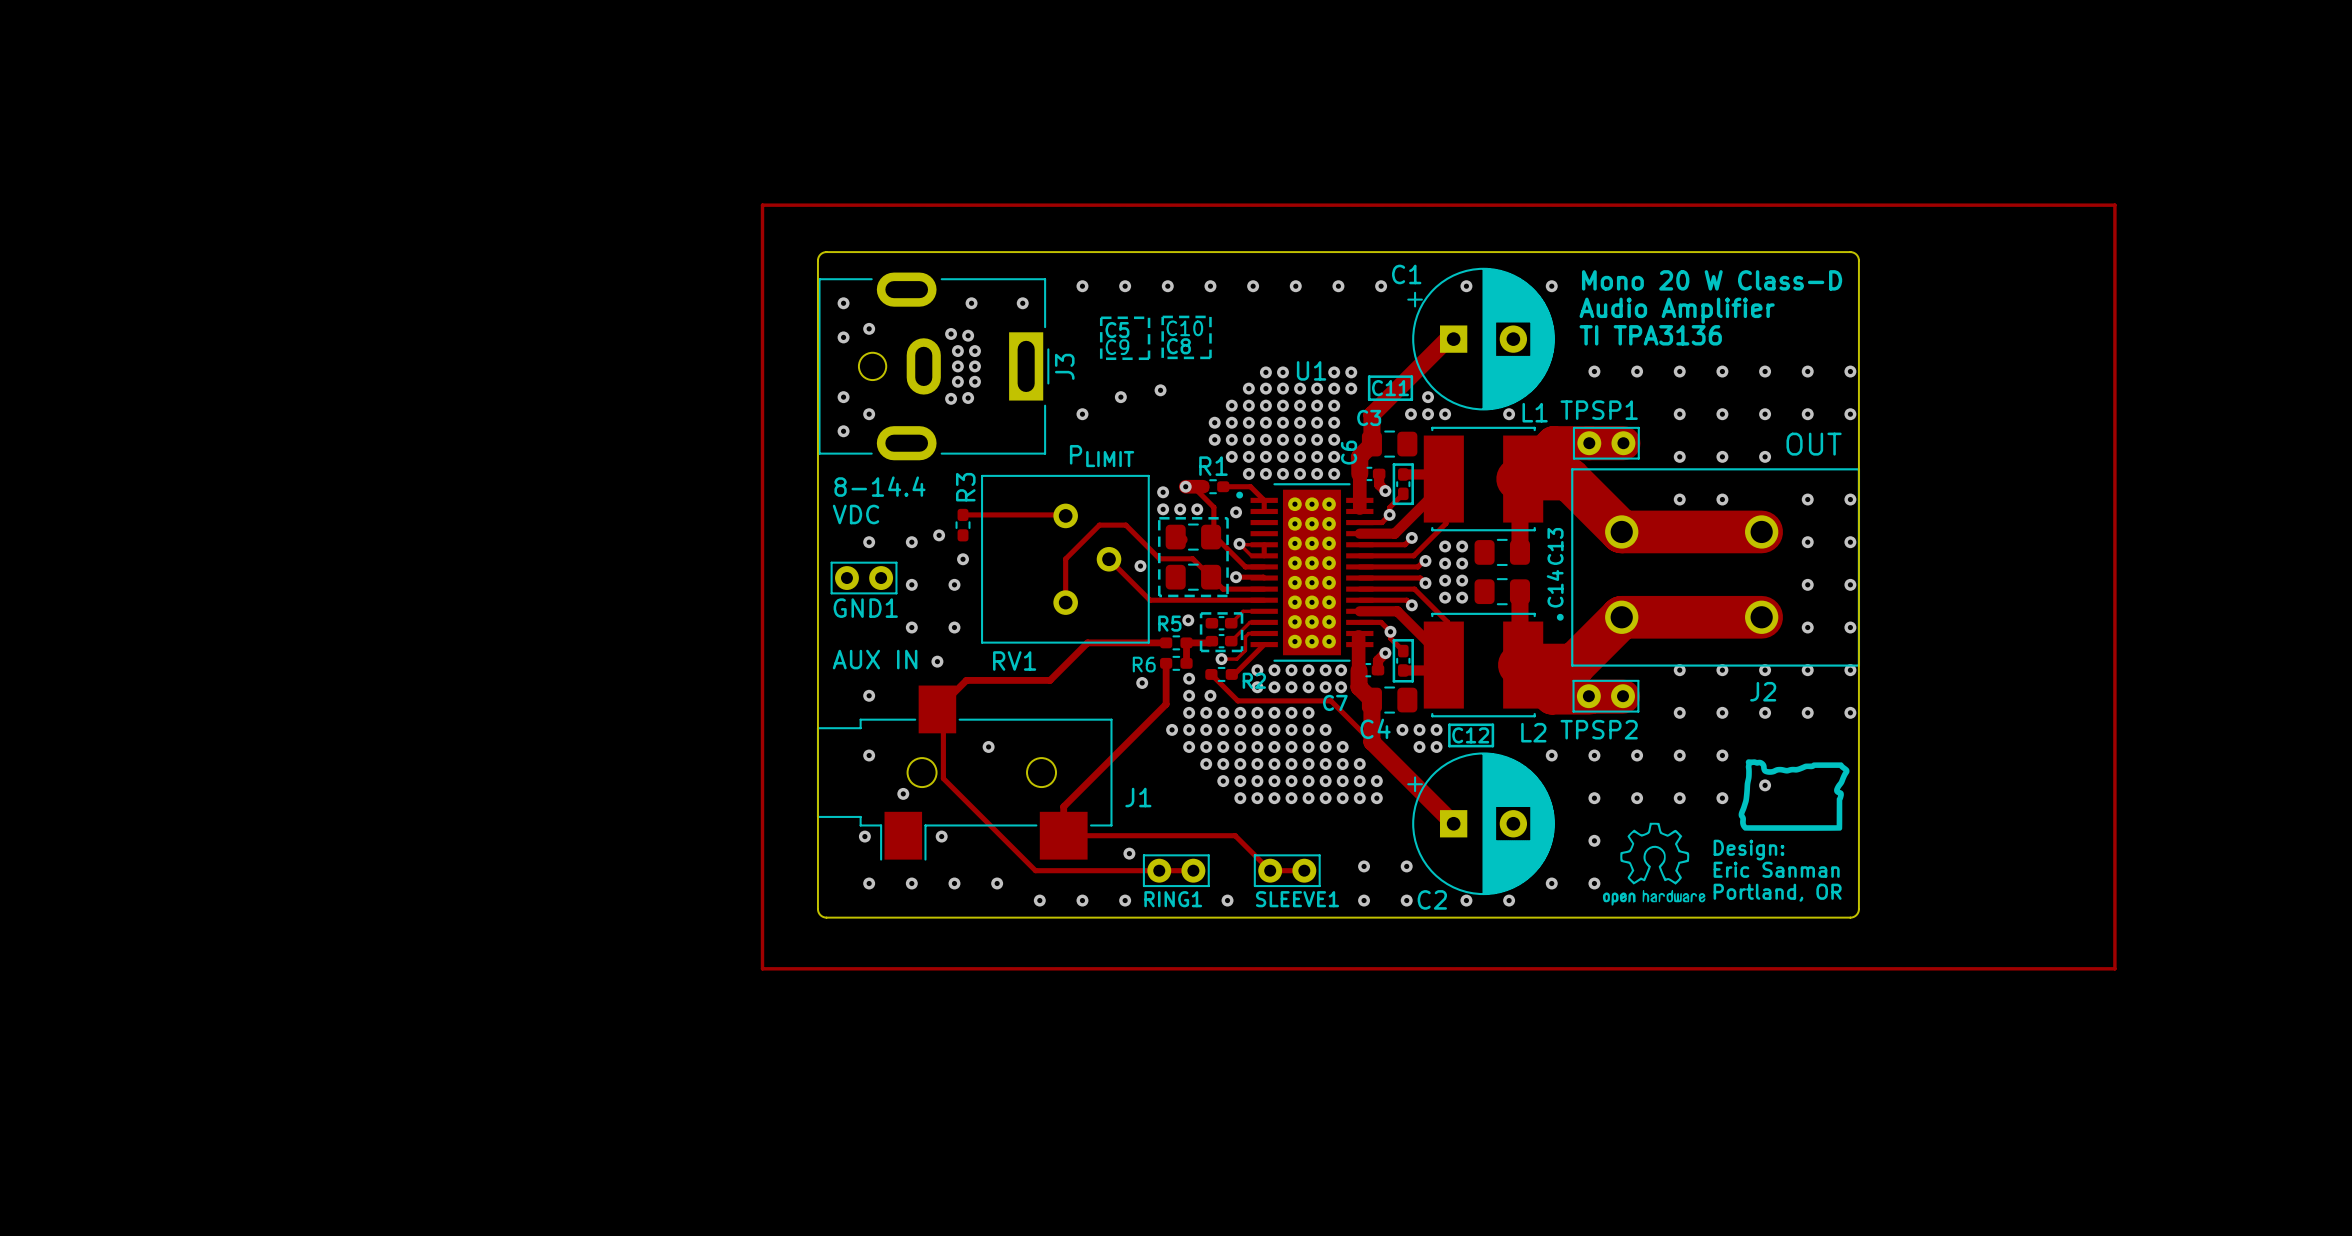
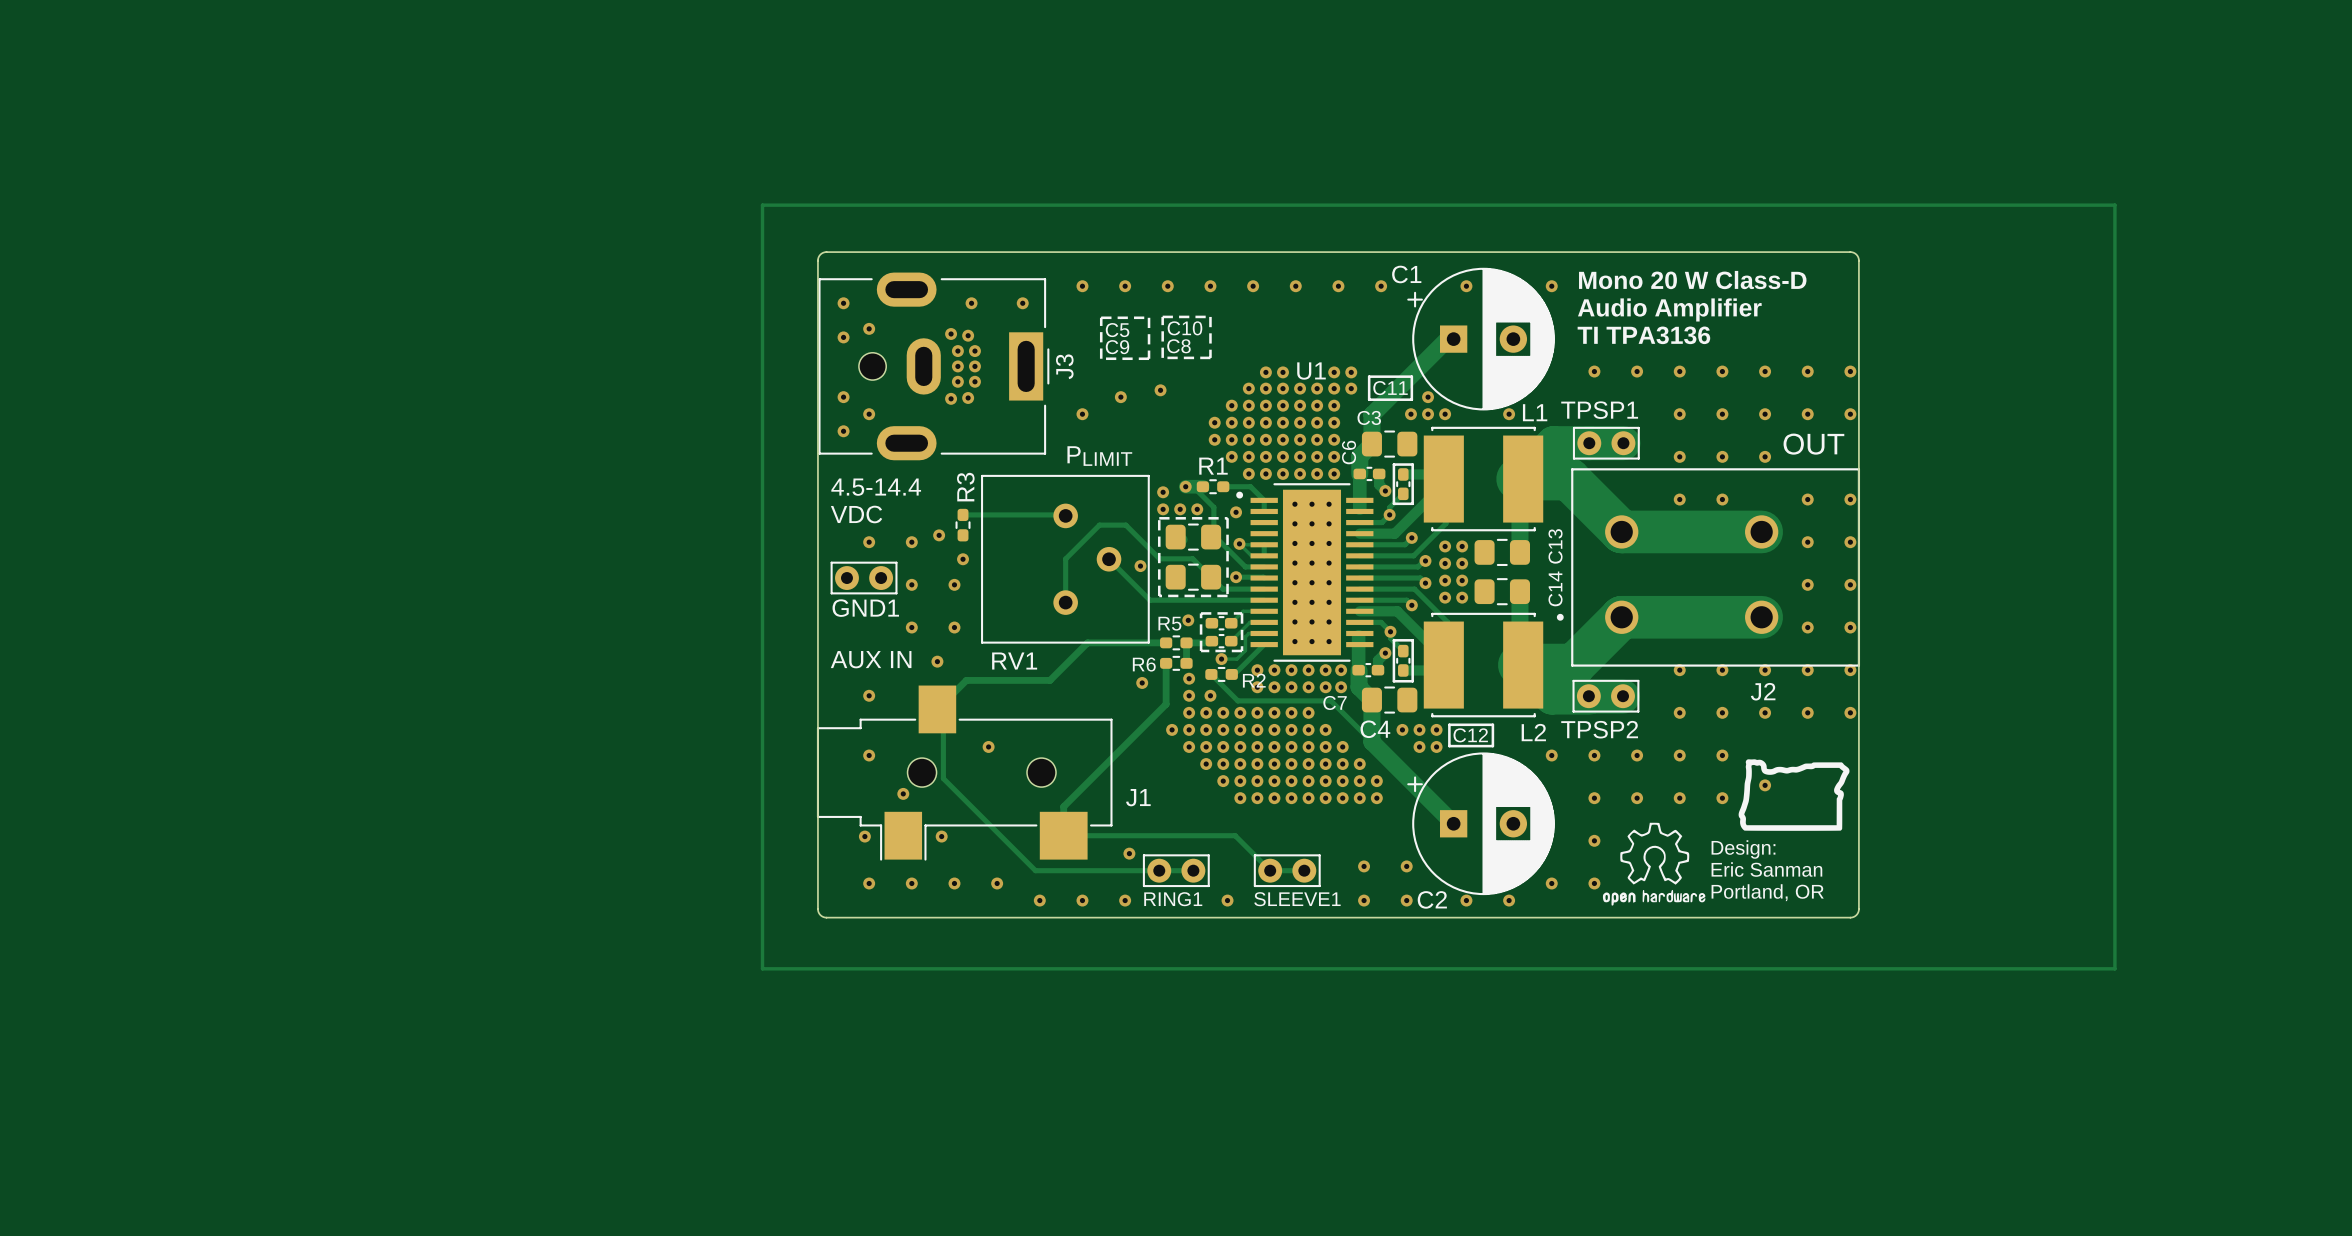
text: 8-14.4 (879, 486) -> 4.5-14.4 (876, 487)

